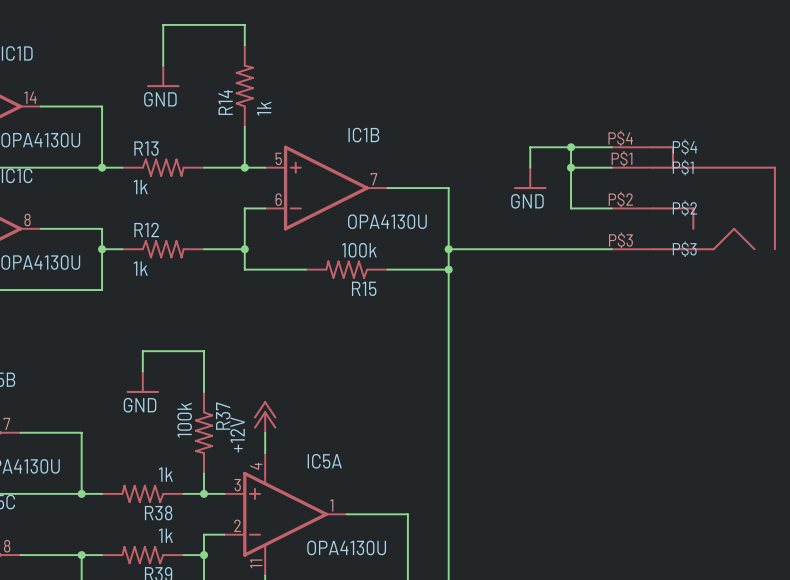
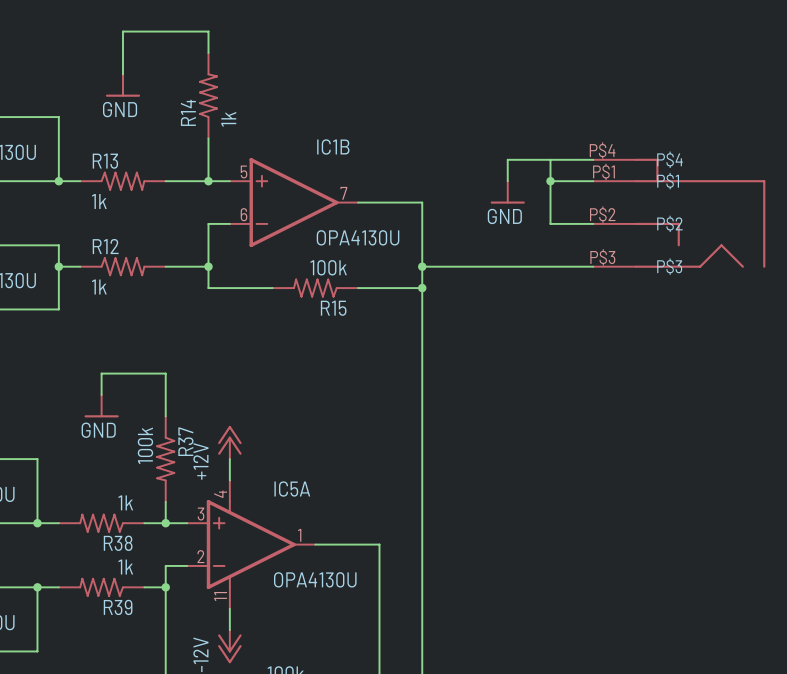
junction: (571, 147) -> none

